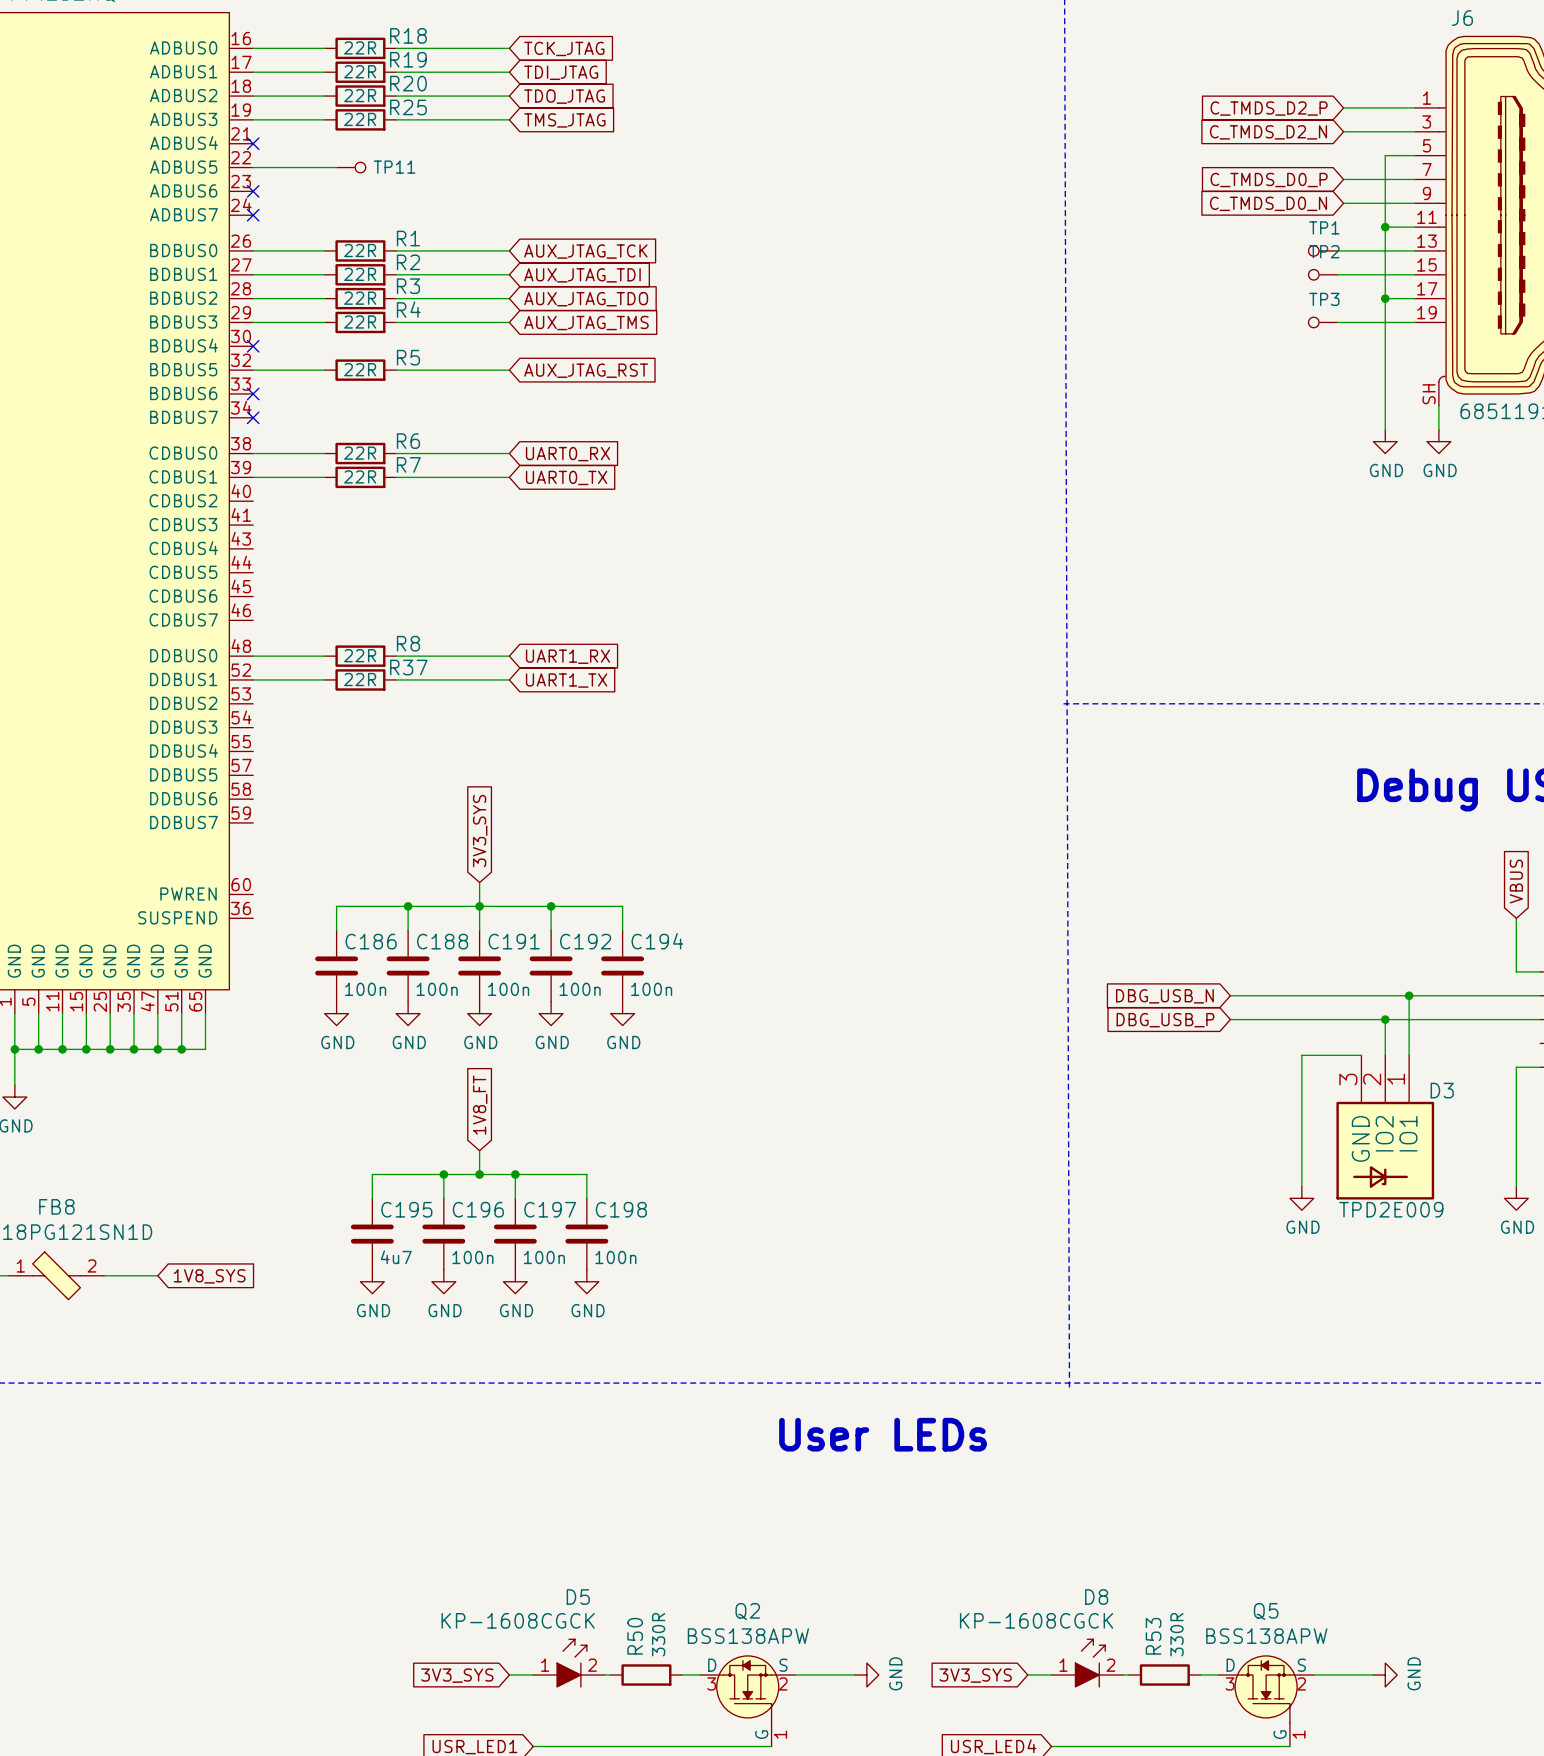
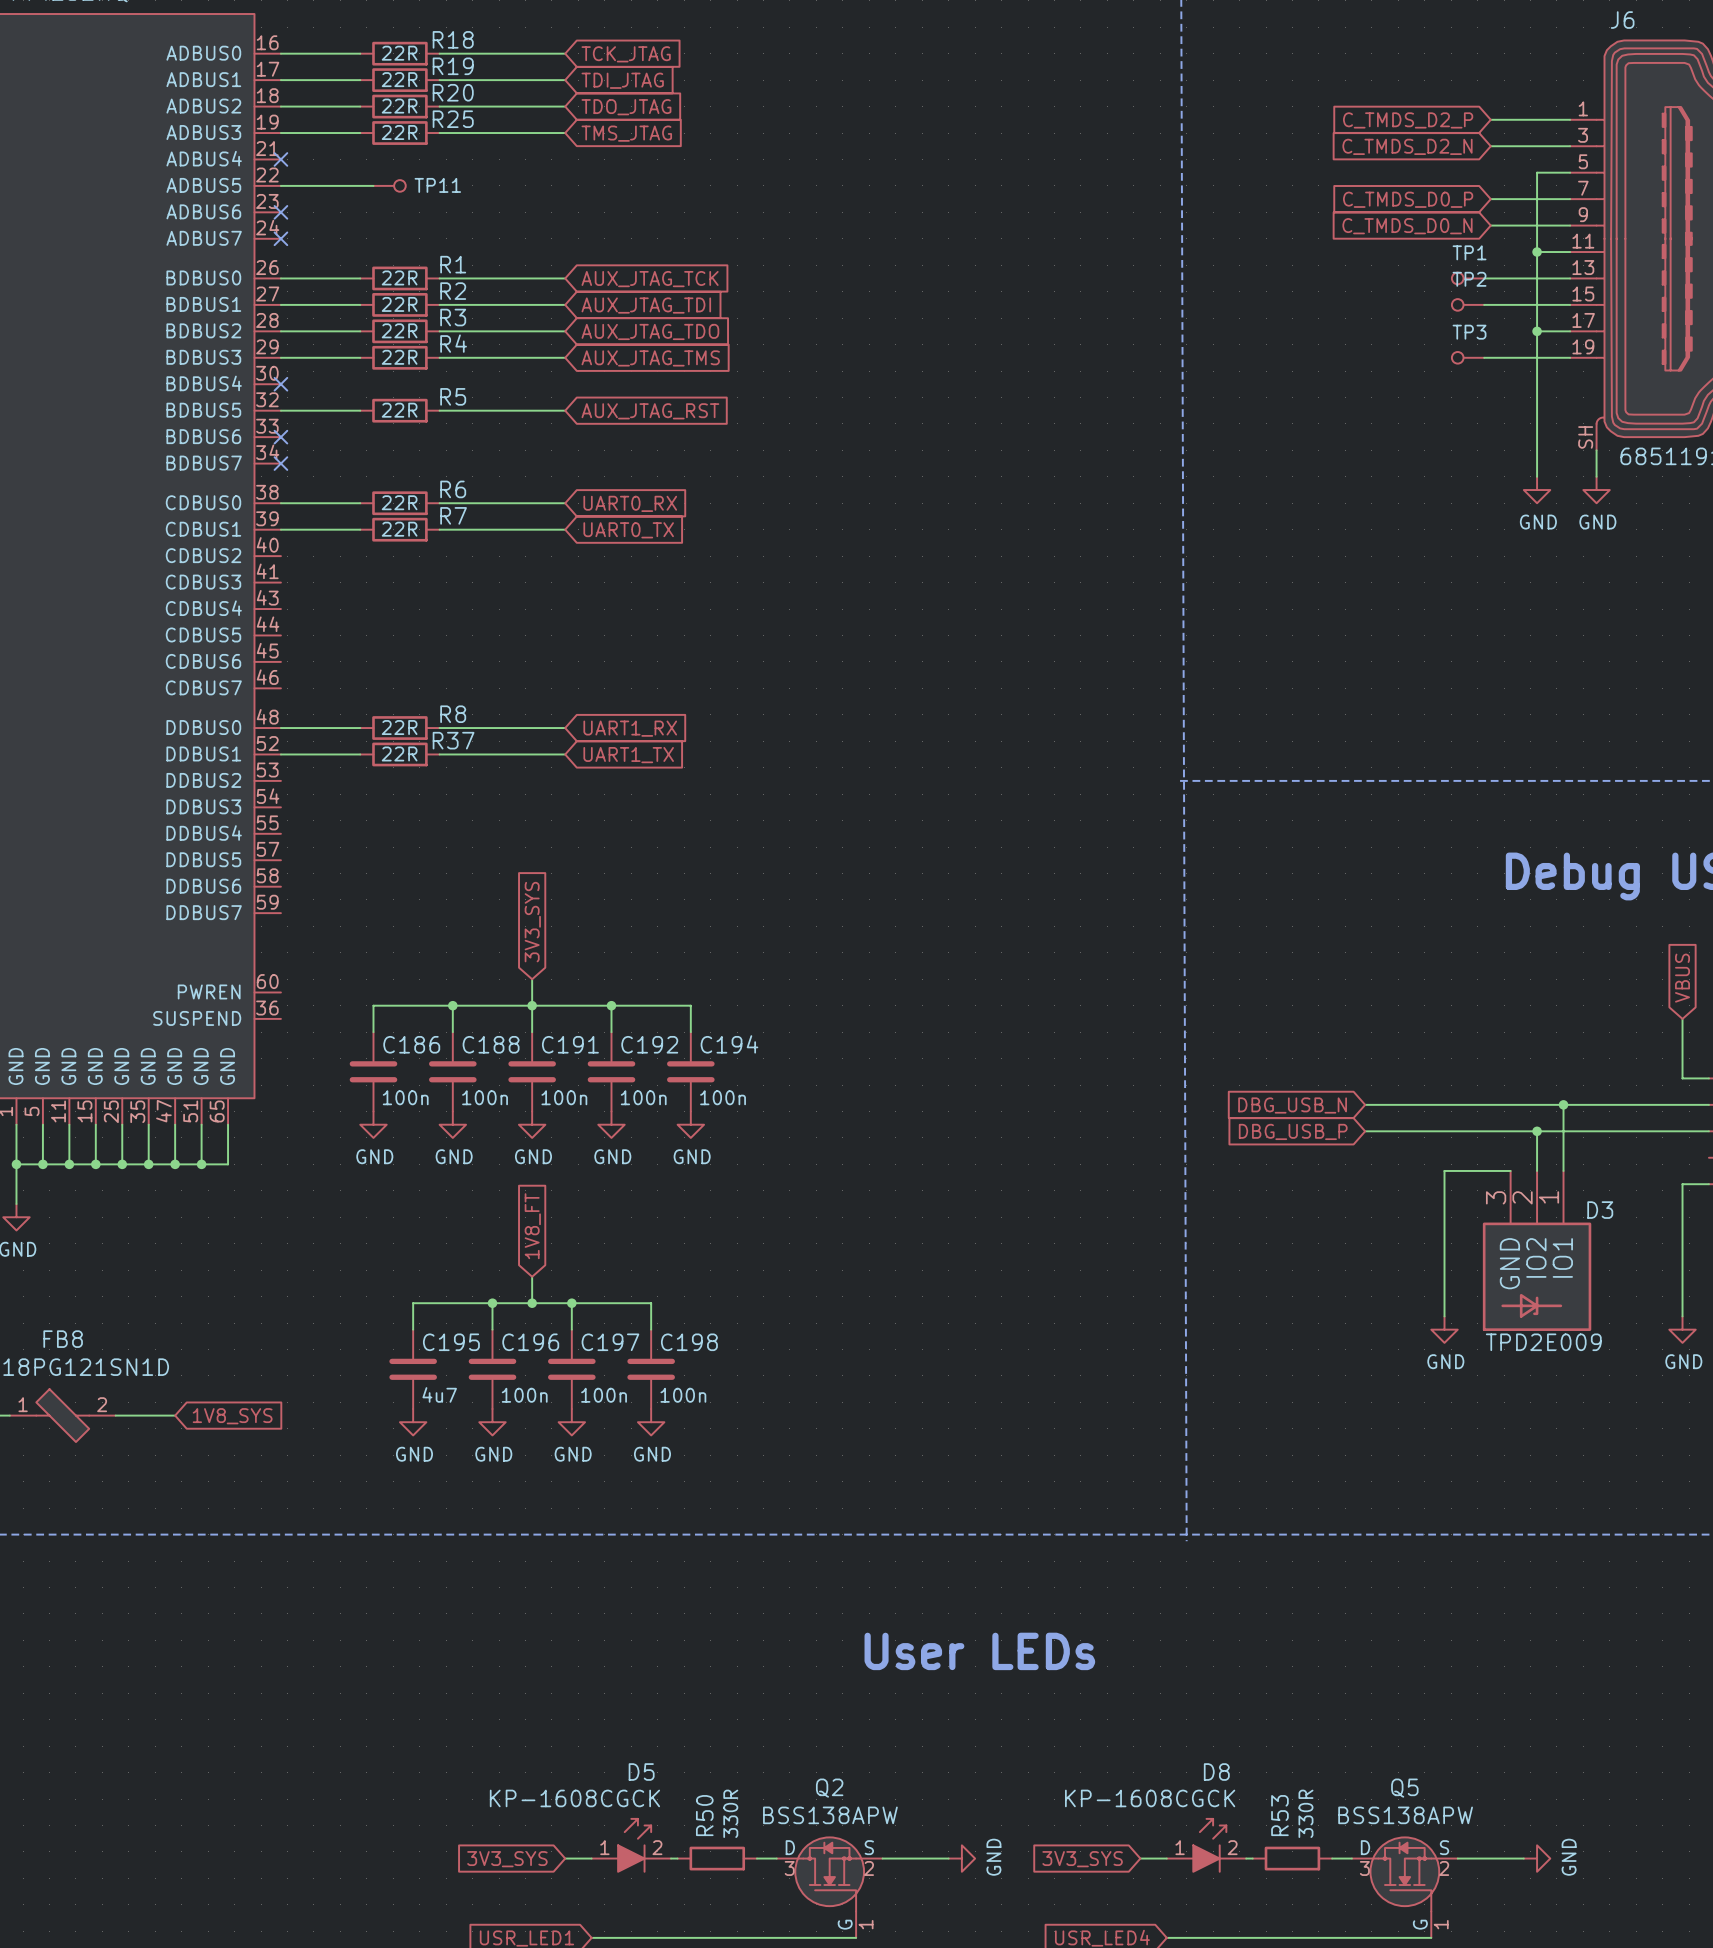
text position: User LEDs (883, 1434) -> User LEDs (979, 1651)

